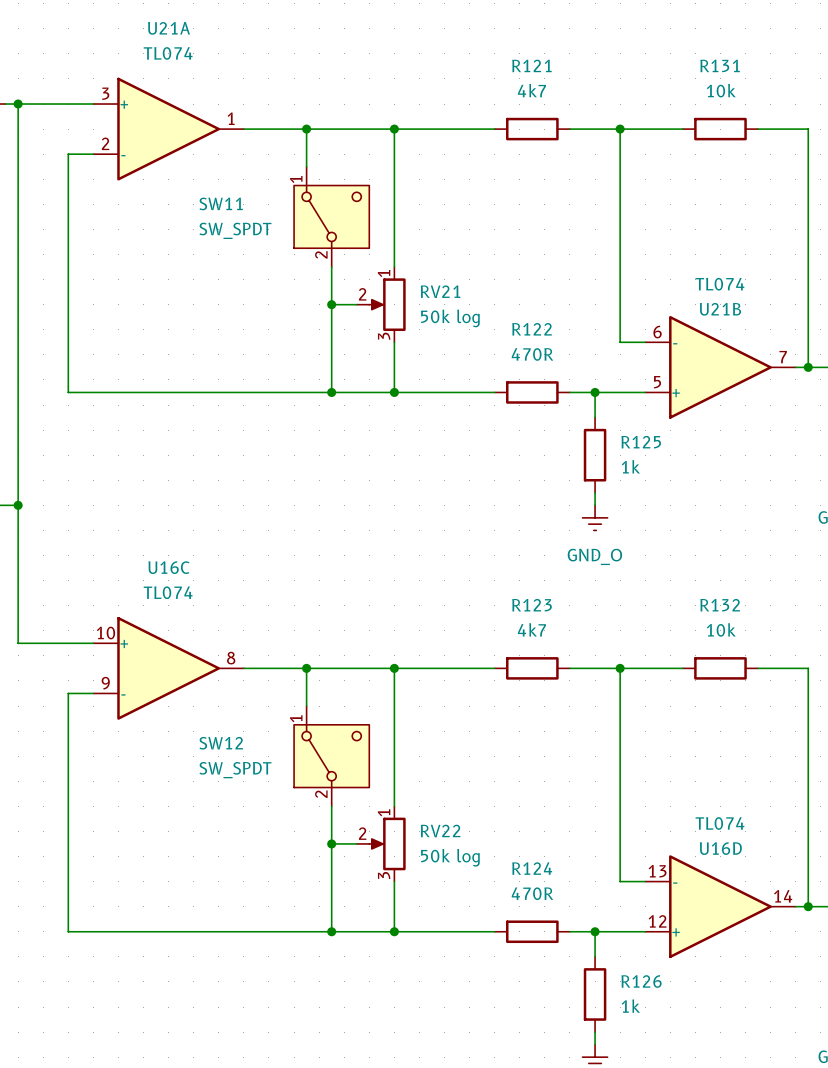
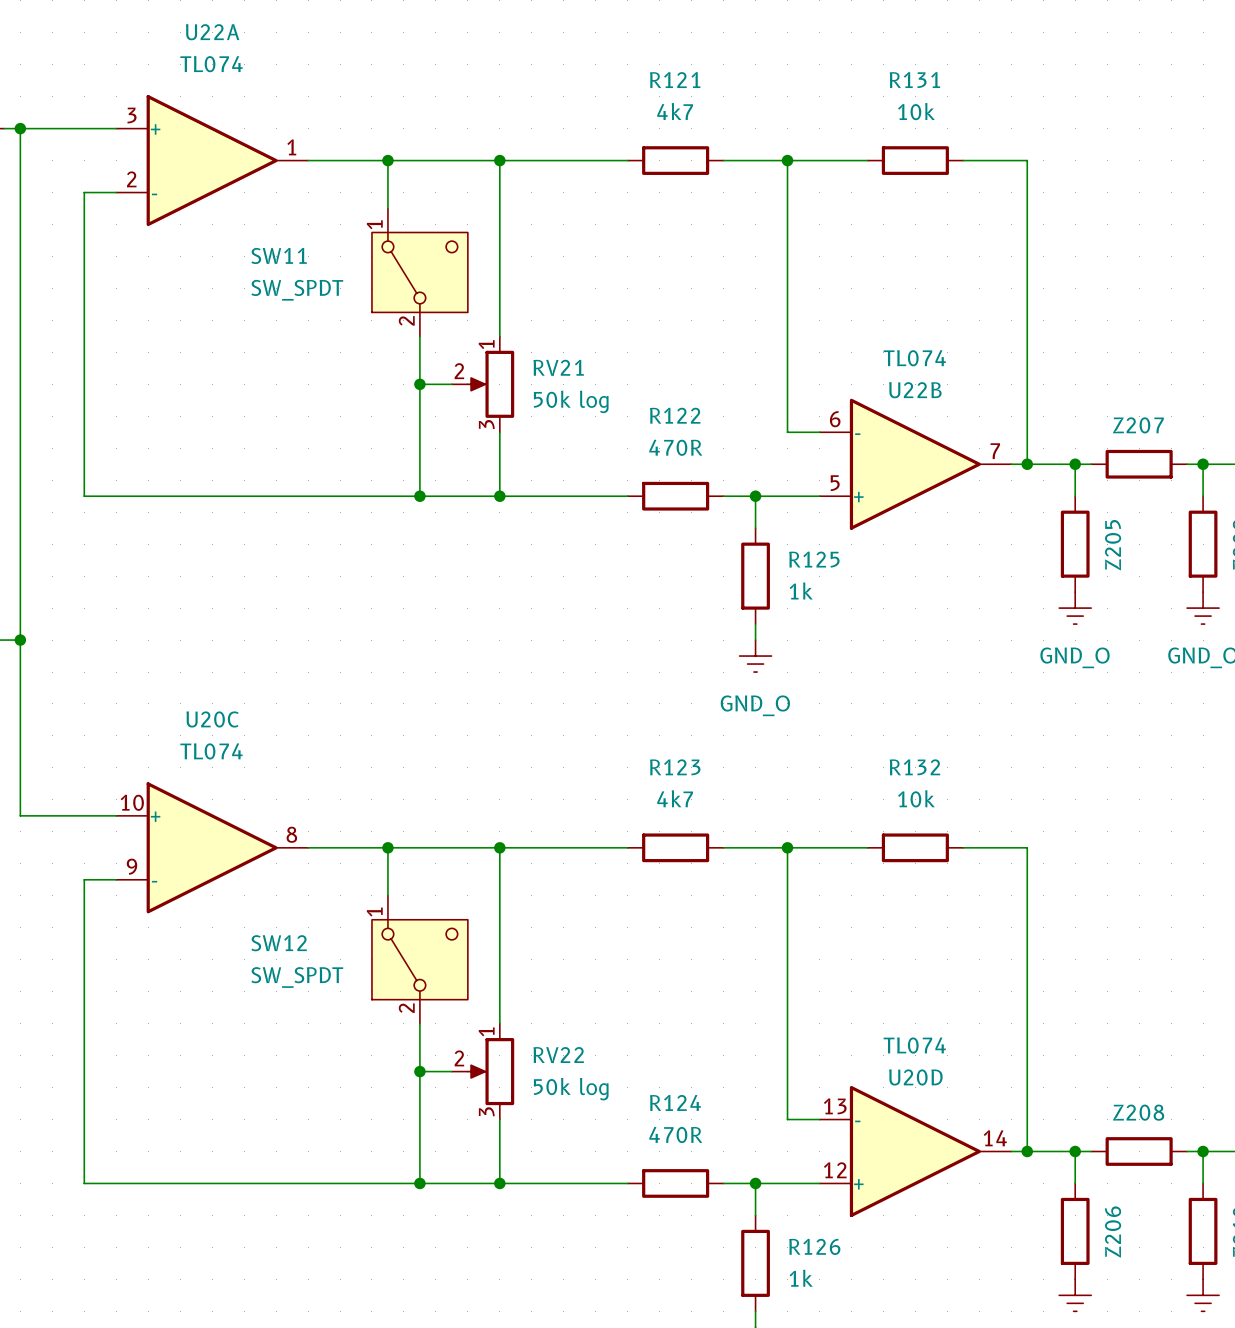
U21A name: U21A (168, 28) -> U22A (212, 32)
U21B name: U21B (720, 309) -> U22B (915, 390)
U16C name: U16C (168, 567) -> U20C (212, 719)
U16D name: U16D (720, 848) -> U20D (915, 1077)

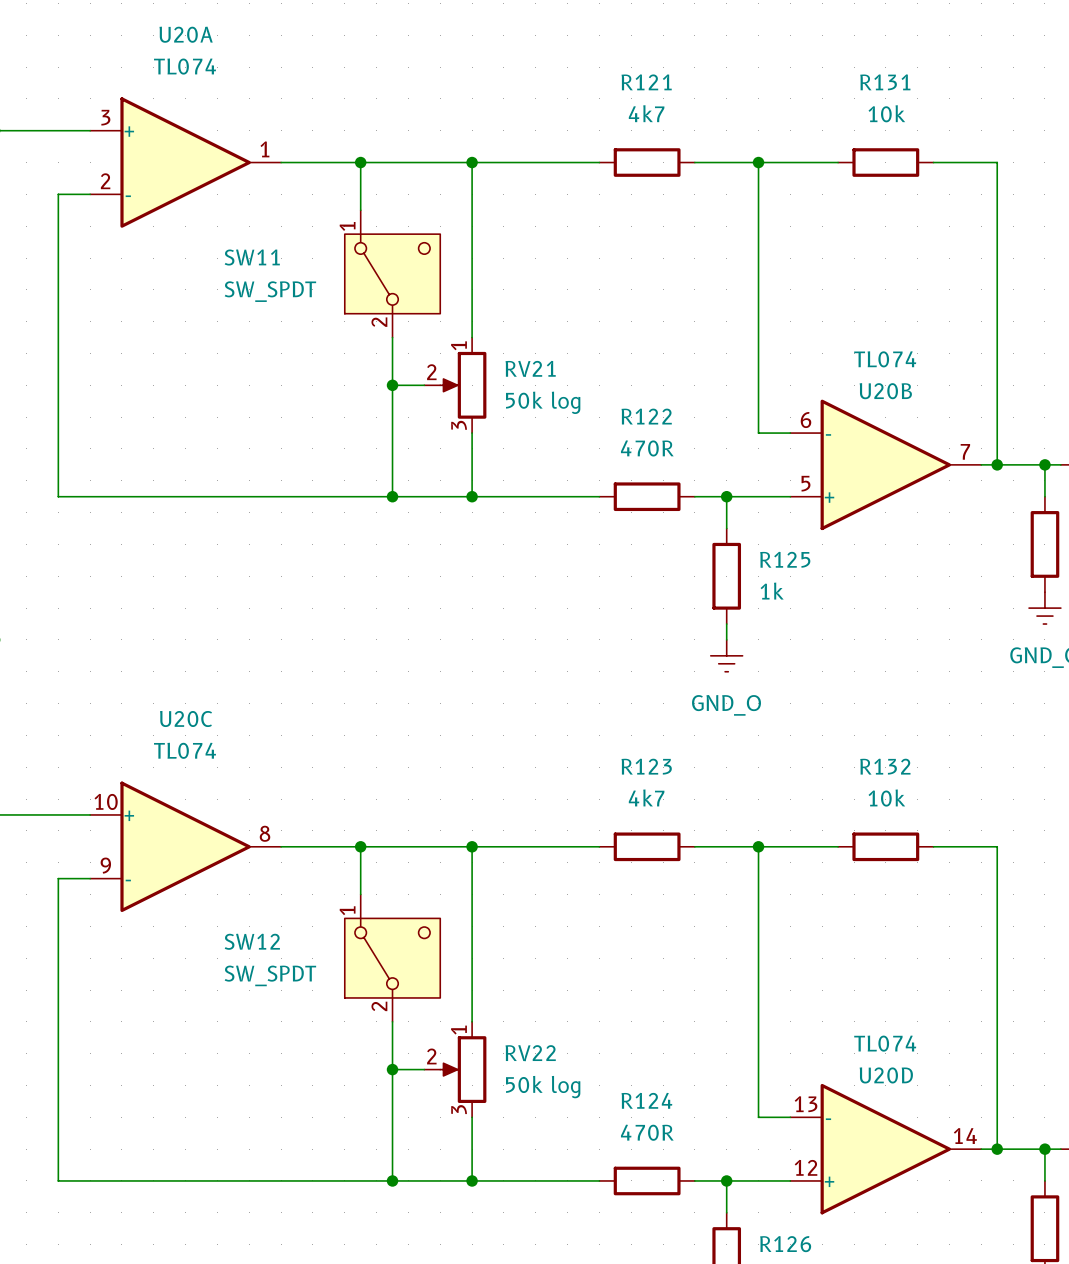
U22A name: U22A (212, 32) -> U20A (186, 34)
U22B name: U22B (915, 390) -> U20B (885, 391)

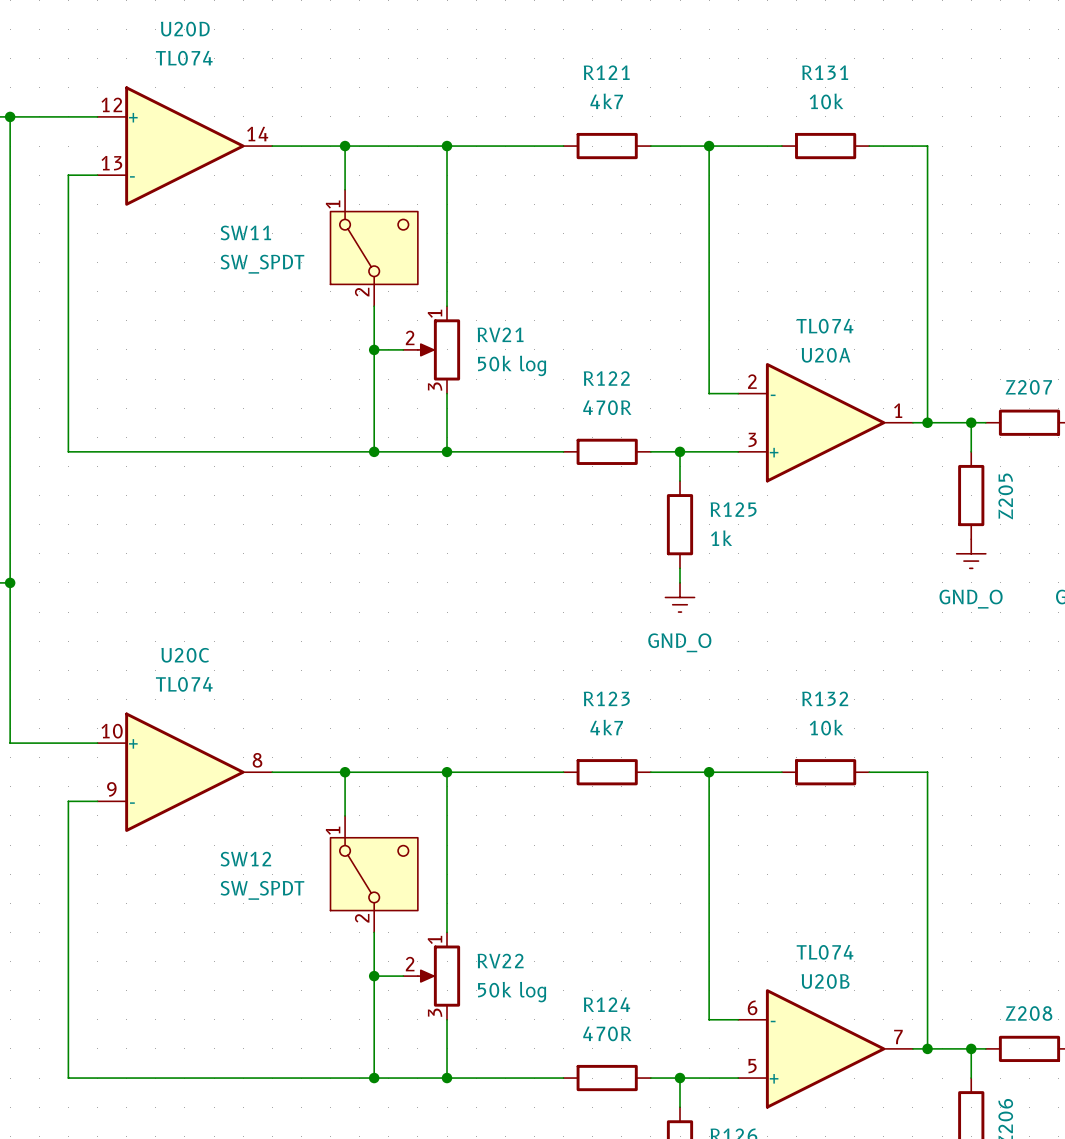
U20A name position: U20A (186, 34) -> U20A (826, 355)
U20A flip: as is (185, 162) -> up-down (825, 422)
U20A position: (185, 162) -> (825, 422)
U20B position: (885, 464) -> (825, 1048)
U20D name position: U20D (886, 1075) -> U20D (185, 29)
U20D flip: as is (885, 1149) -> up-down (184, 146)
U20D position: (885, 1149) -> (184, 146)

